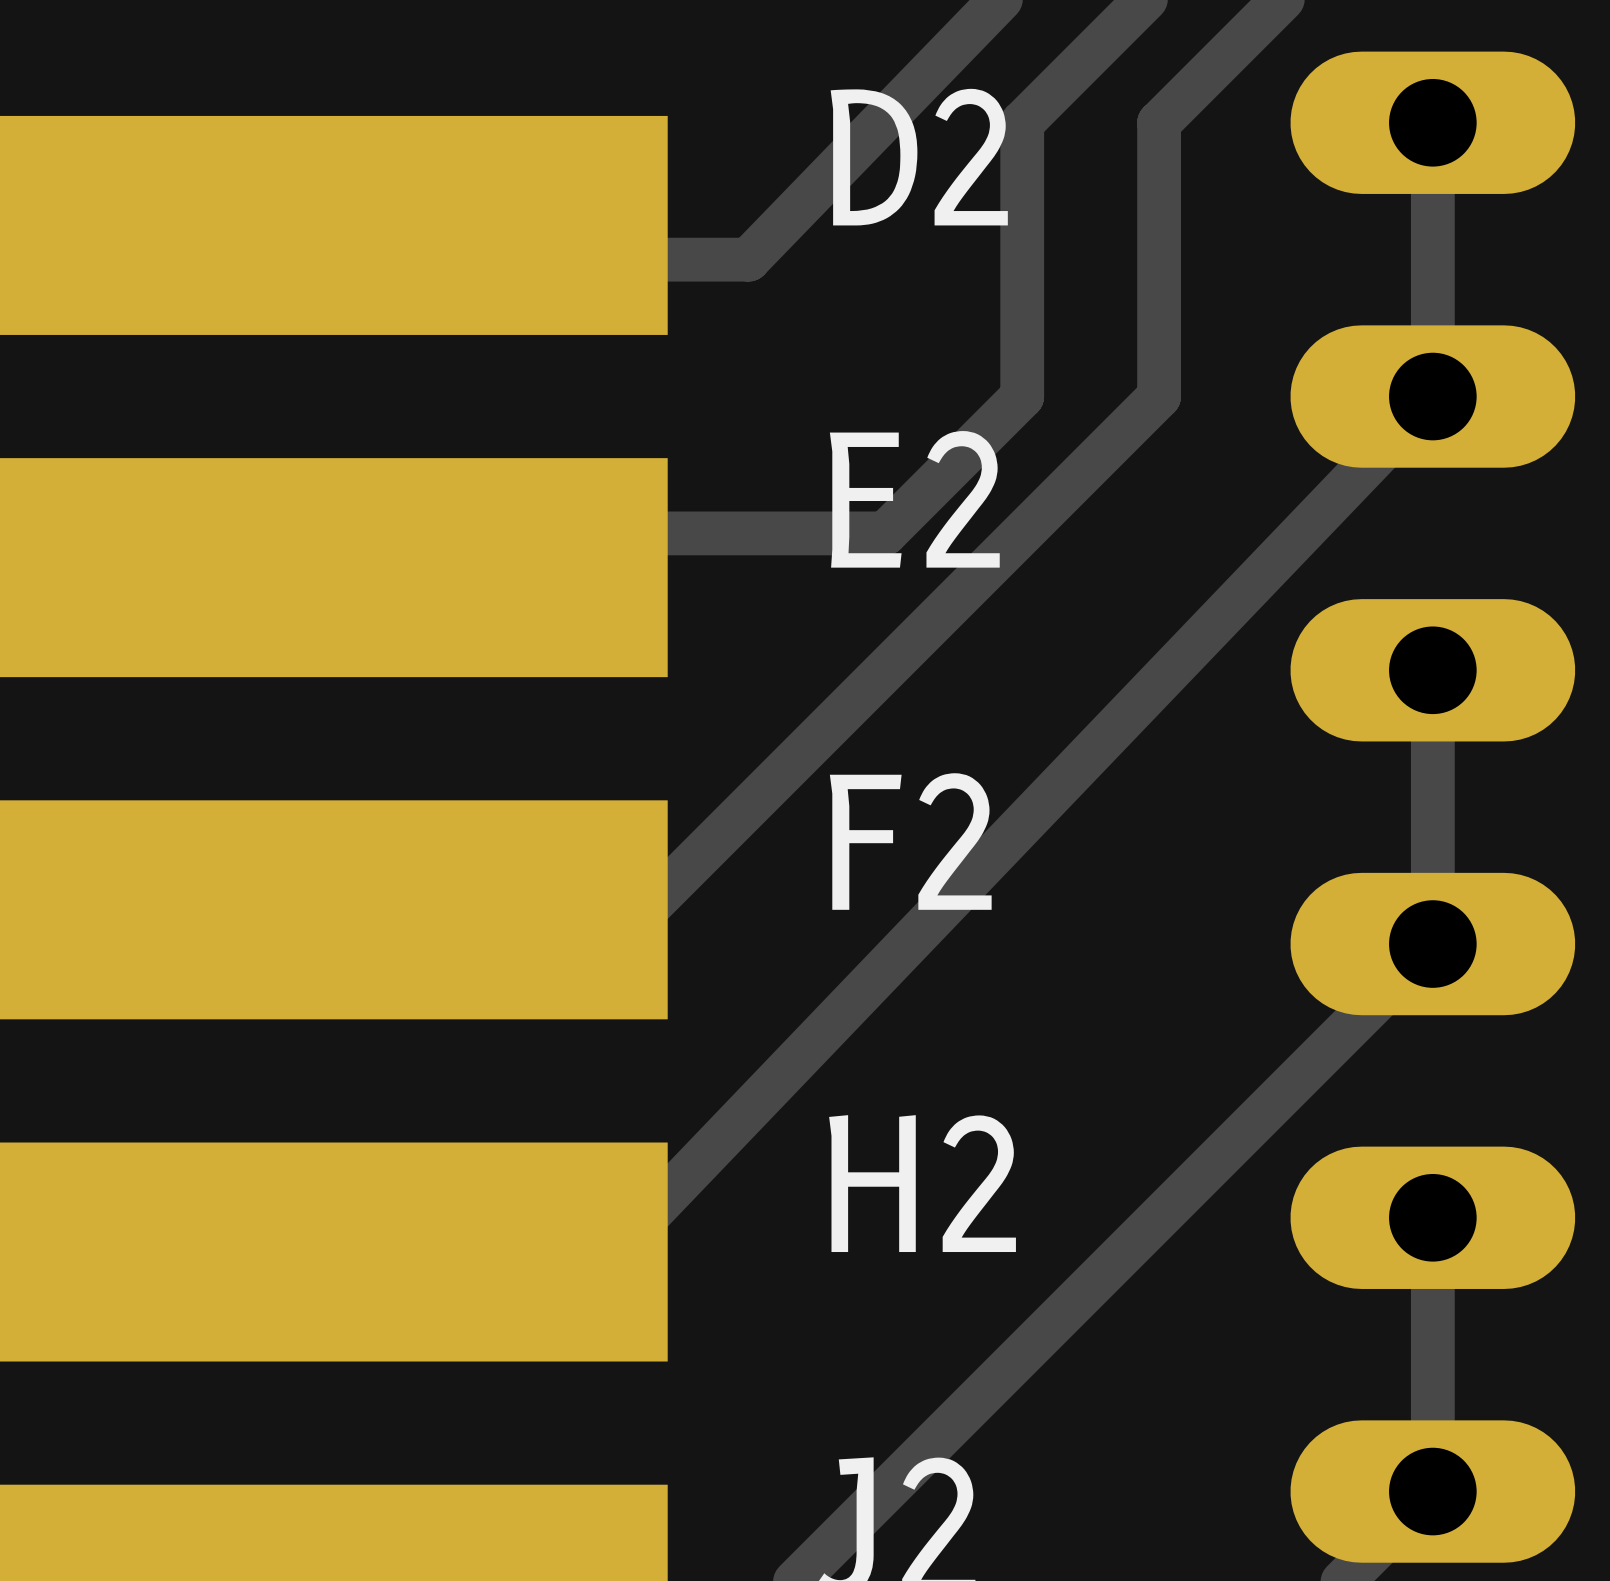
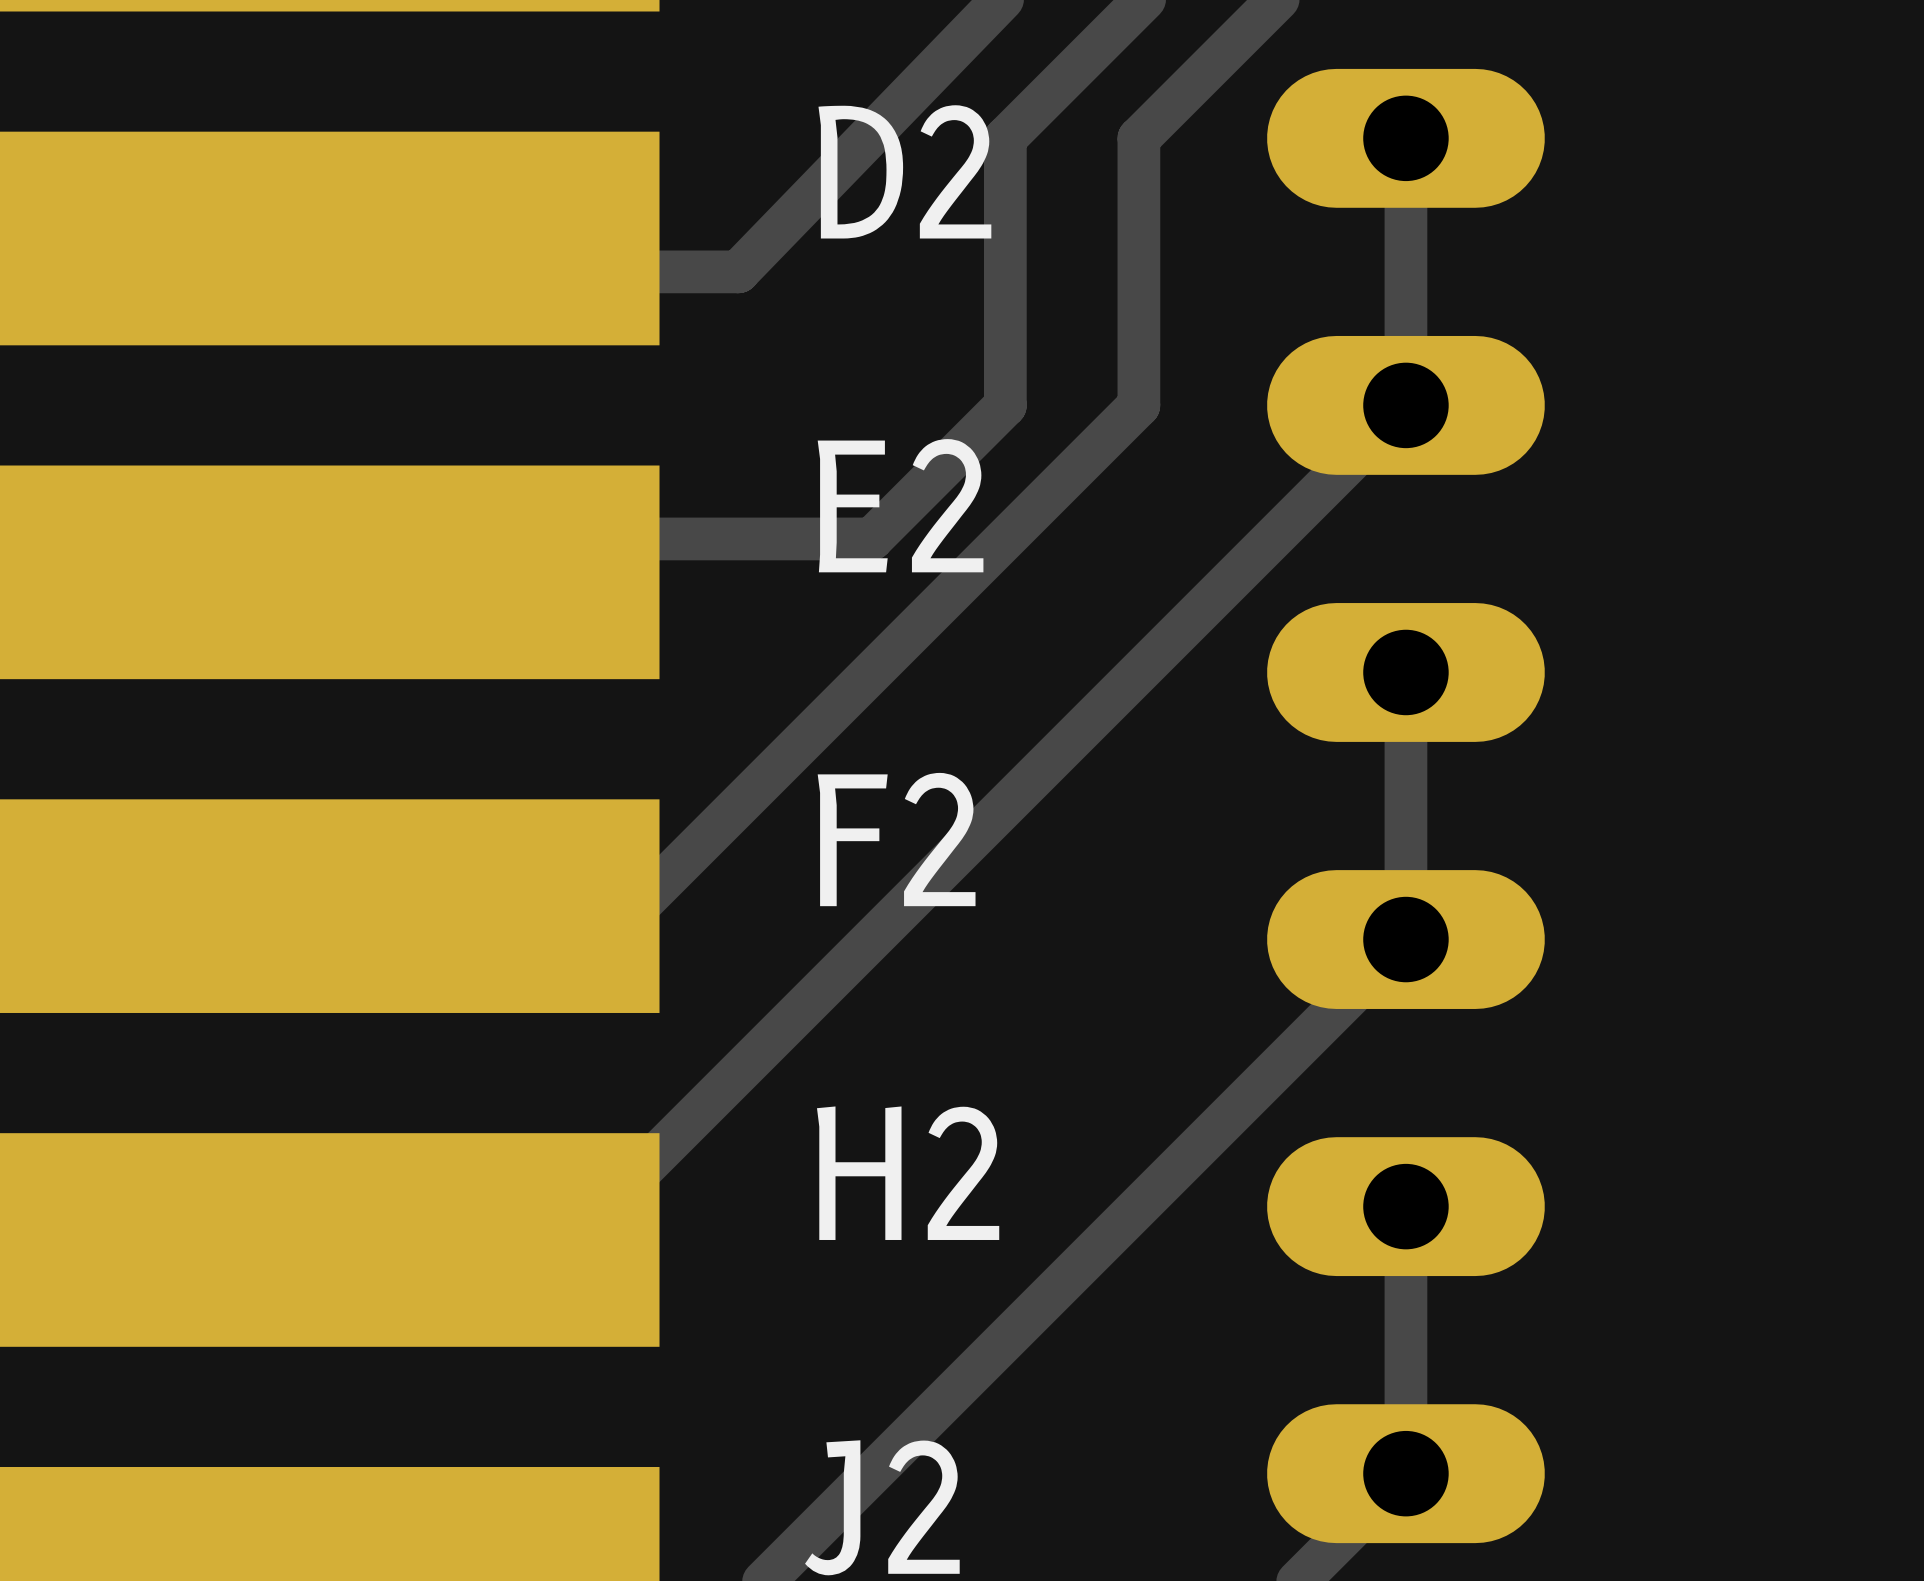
track: (1432, 396) (645, 1217) (611, 1217) -> (1405, 405) (604, 1206)

